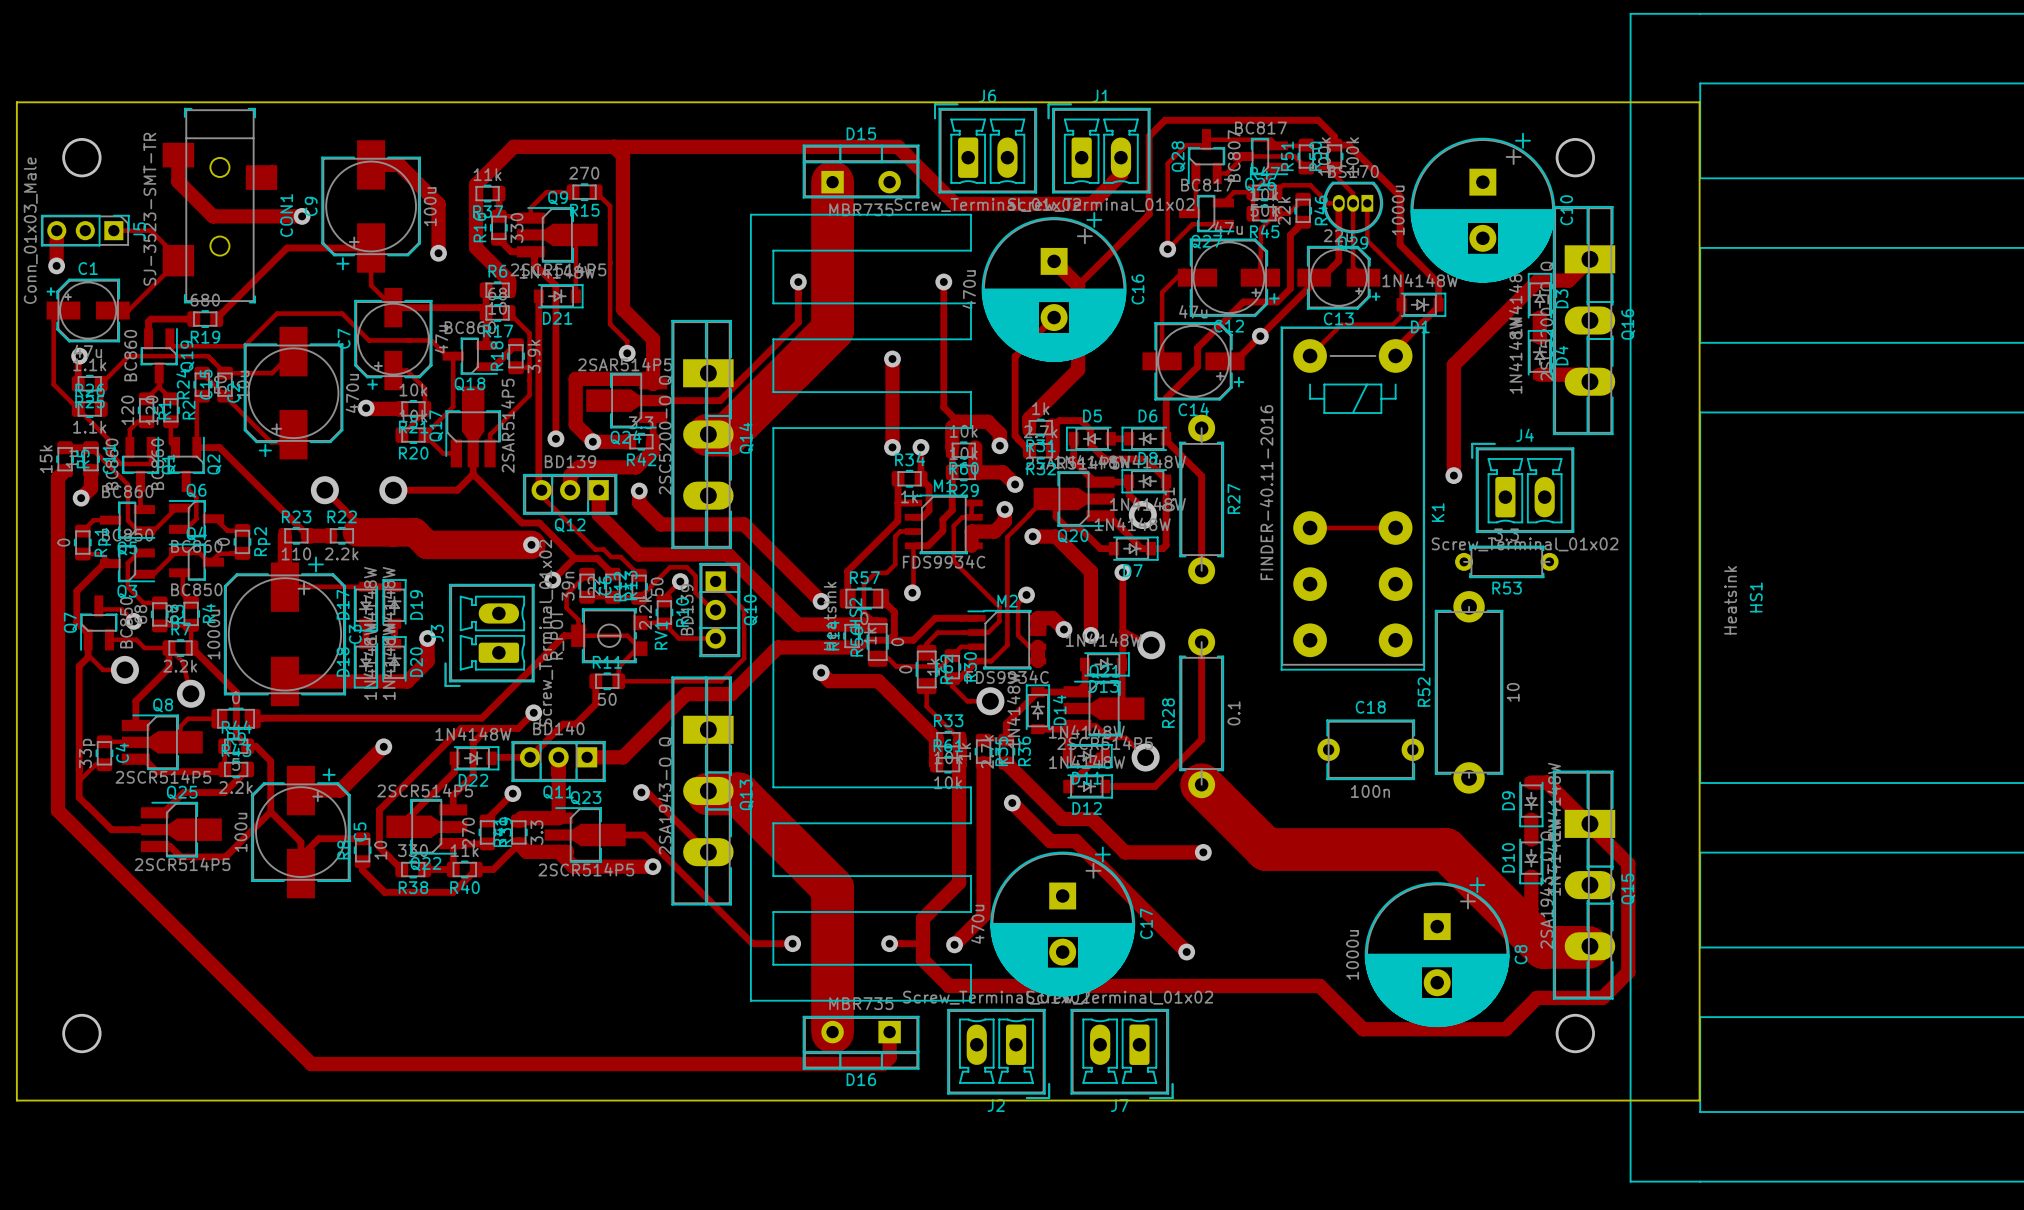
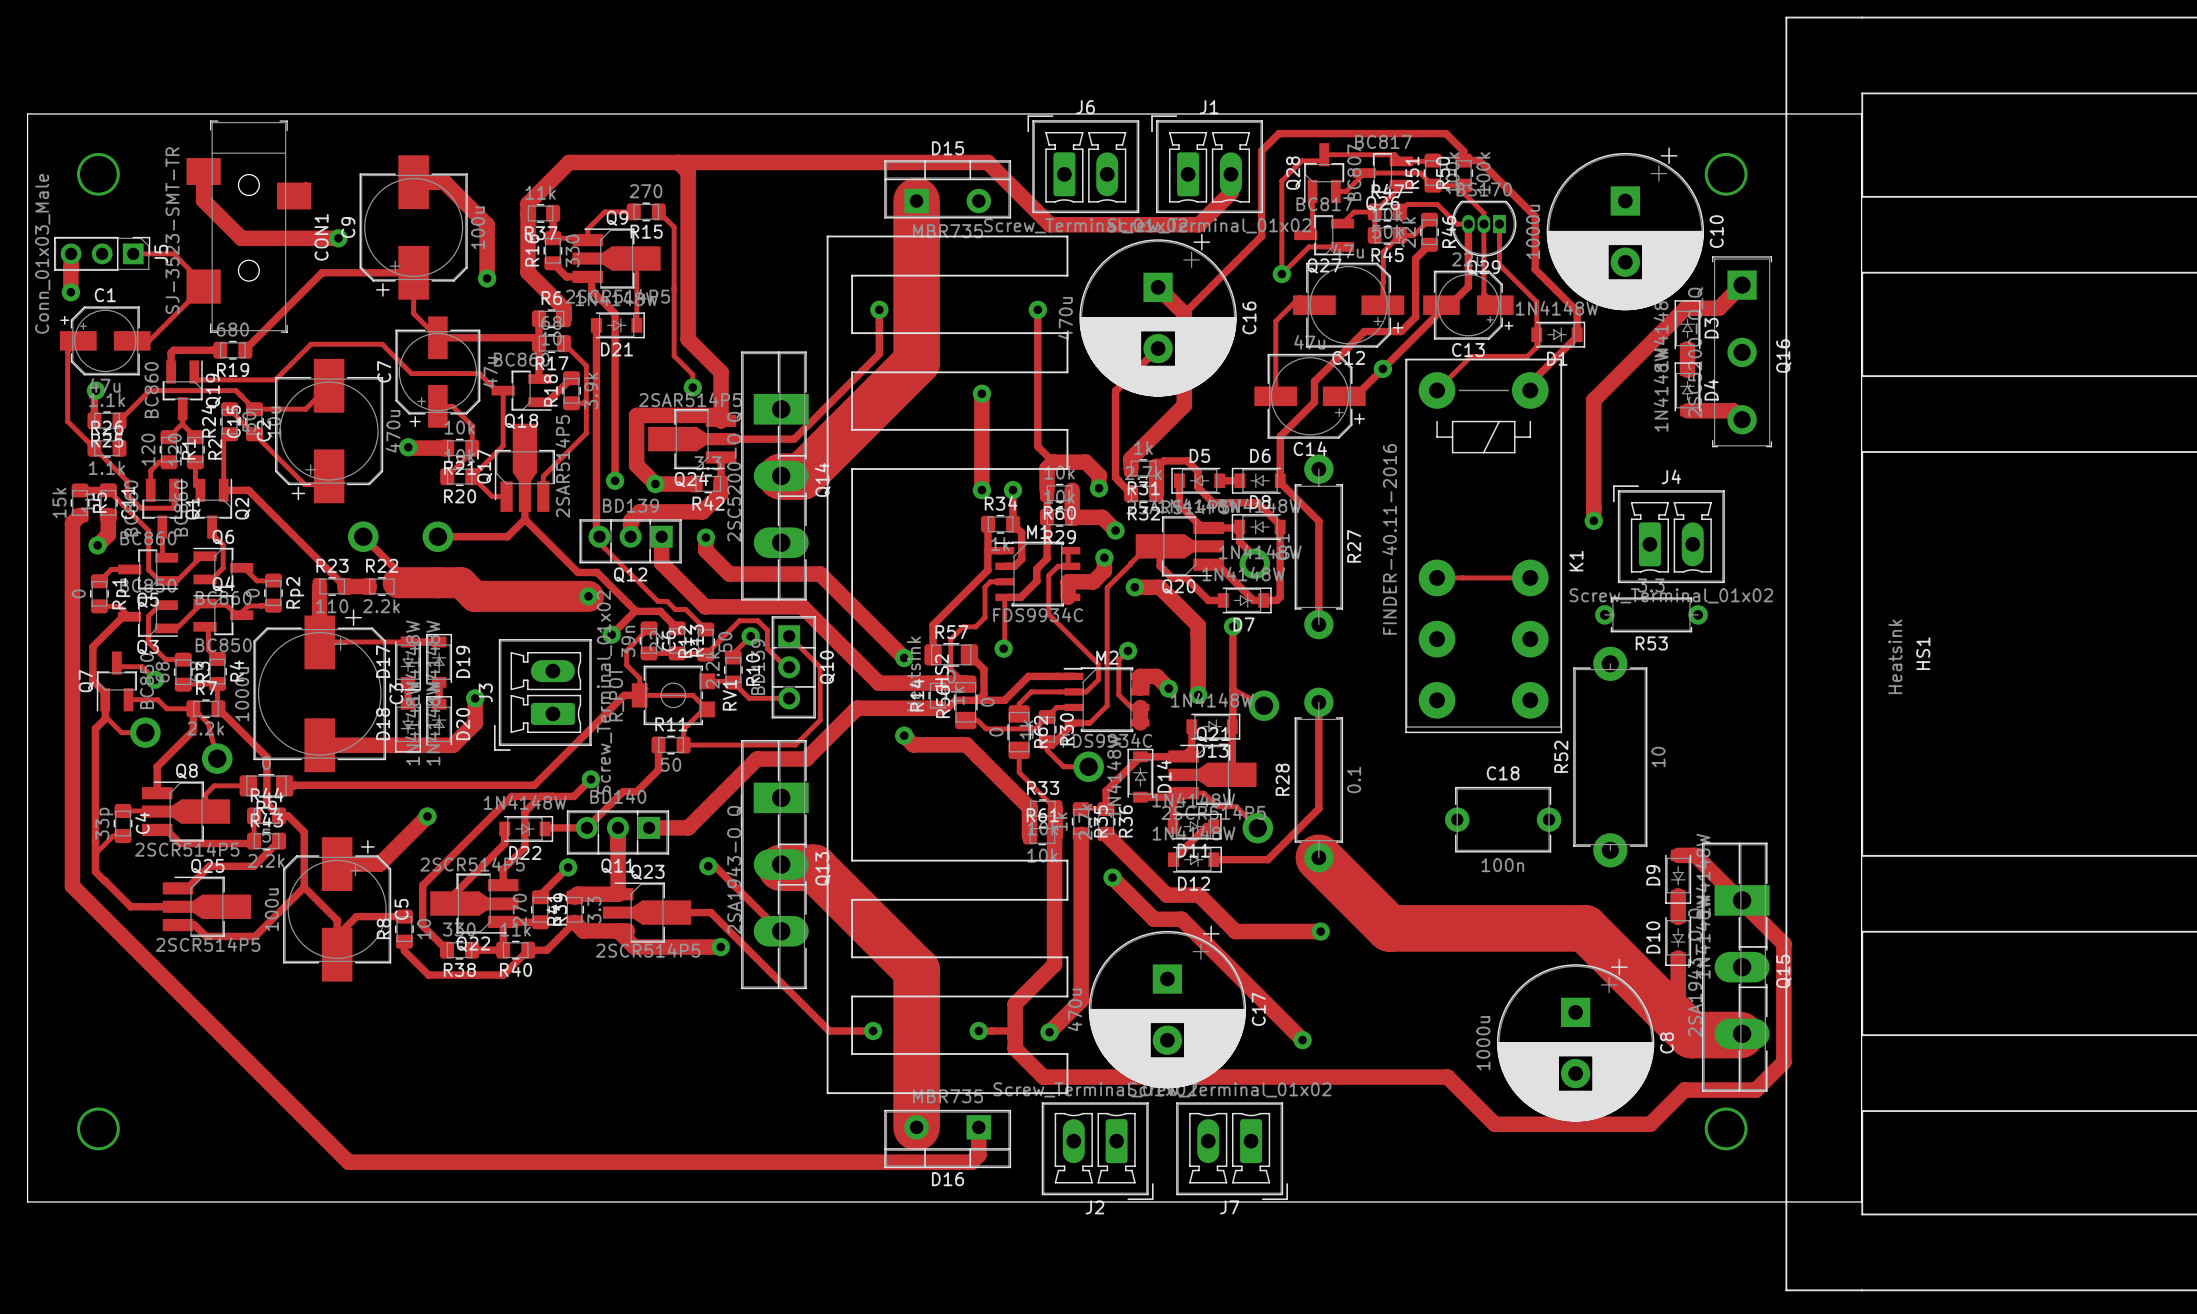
Q16 footprint: [1553, 206, 1616, 435] -> [1712, 256, 1773, 448]

